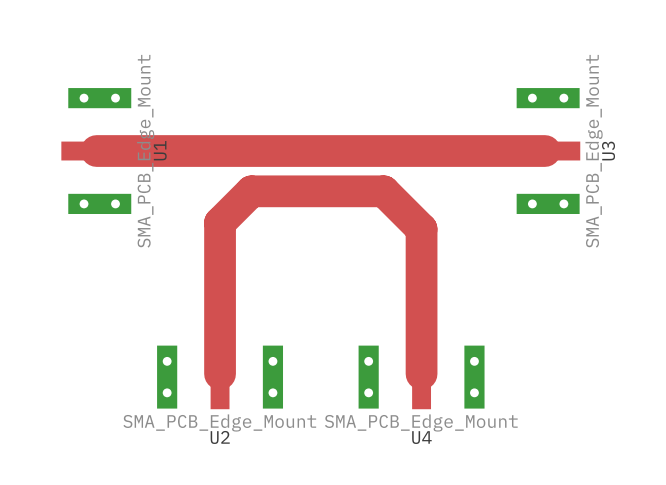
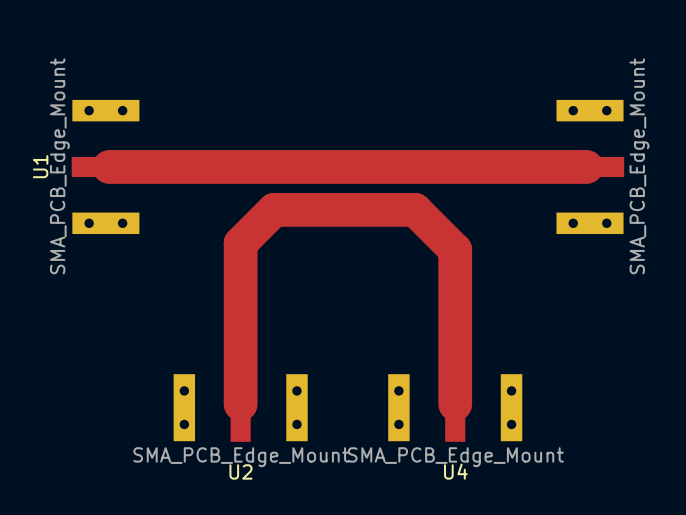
U1 rotation: 0° (96, 151) -> 180° (109, 166)
U3 name: U3 (608, 151) -> none

